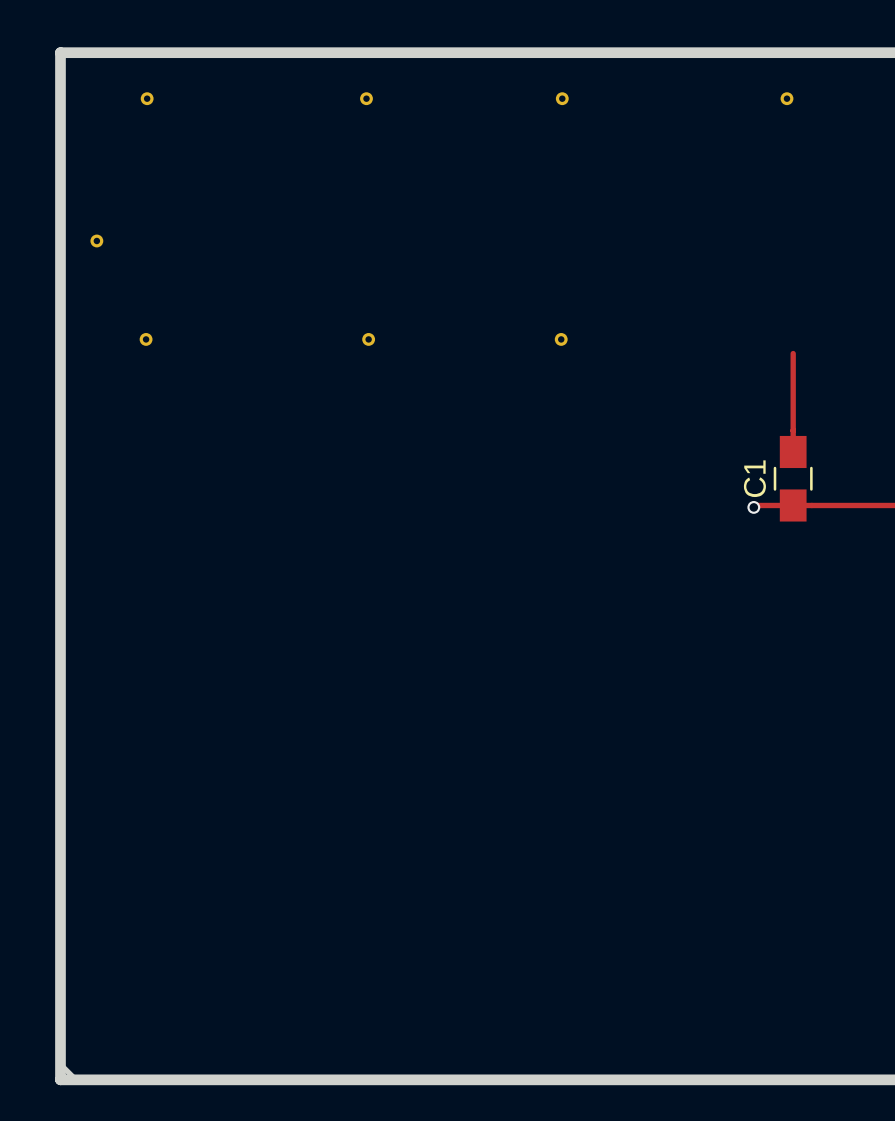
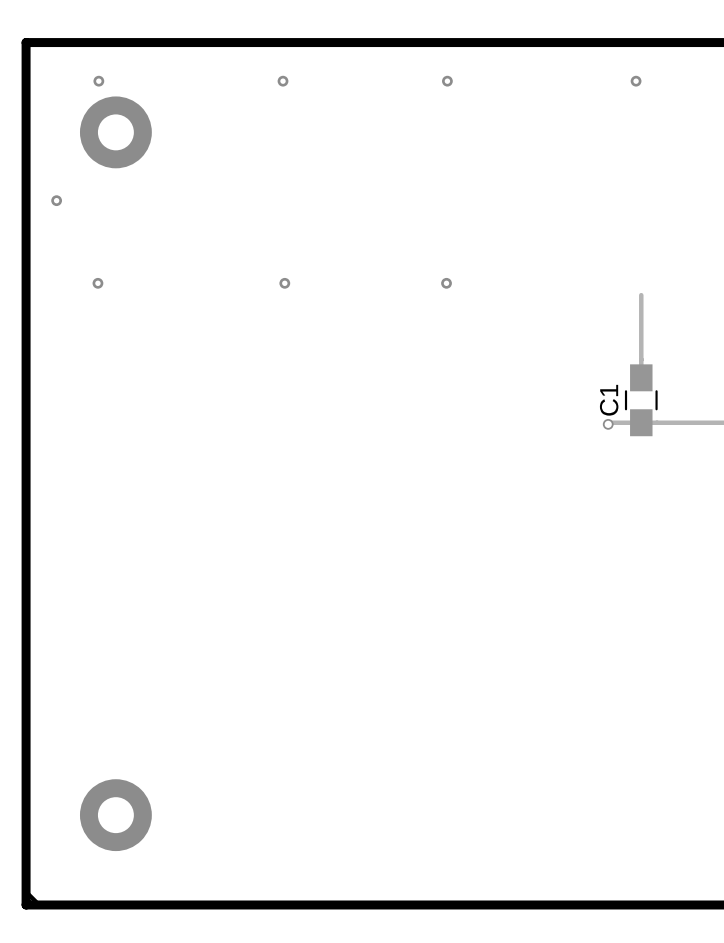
part: none -> (115, 132)
part: none -> (115, 815)

